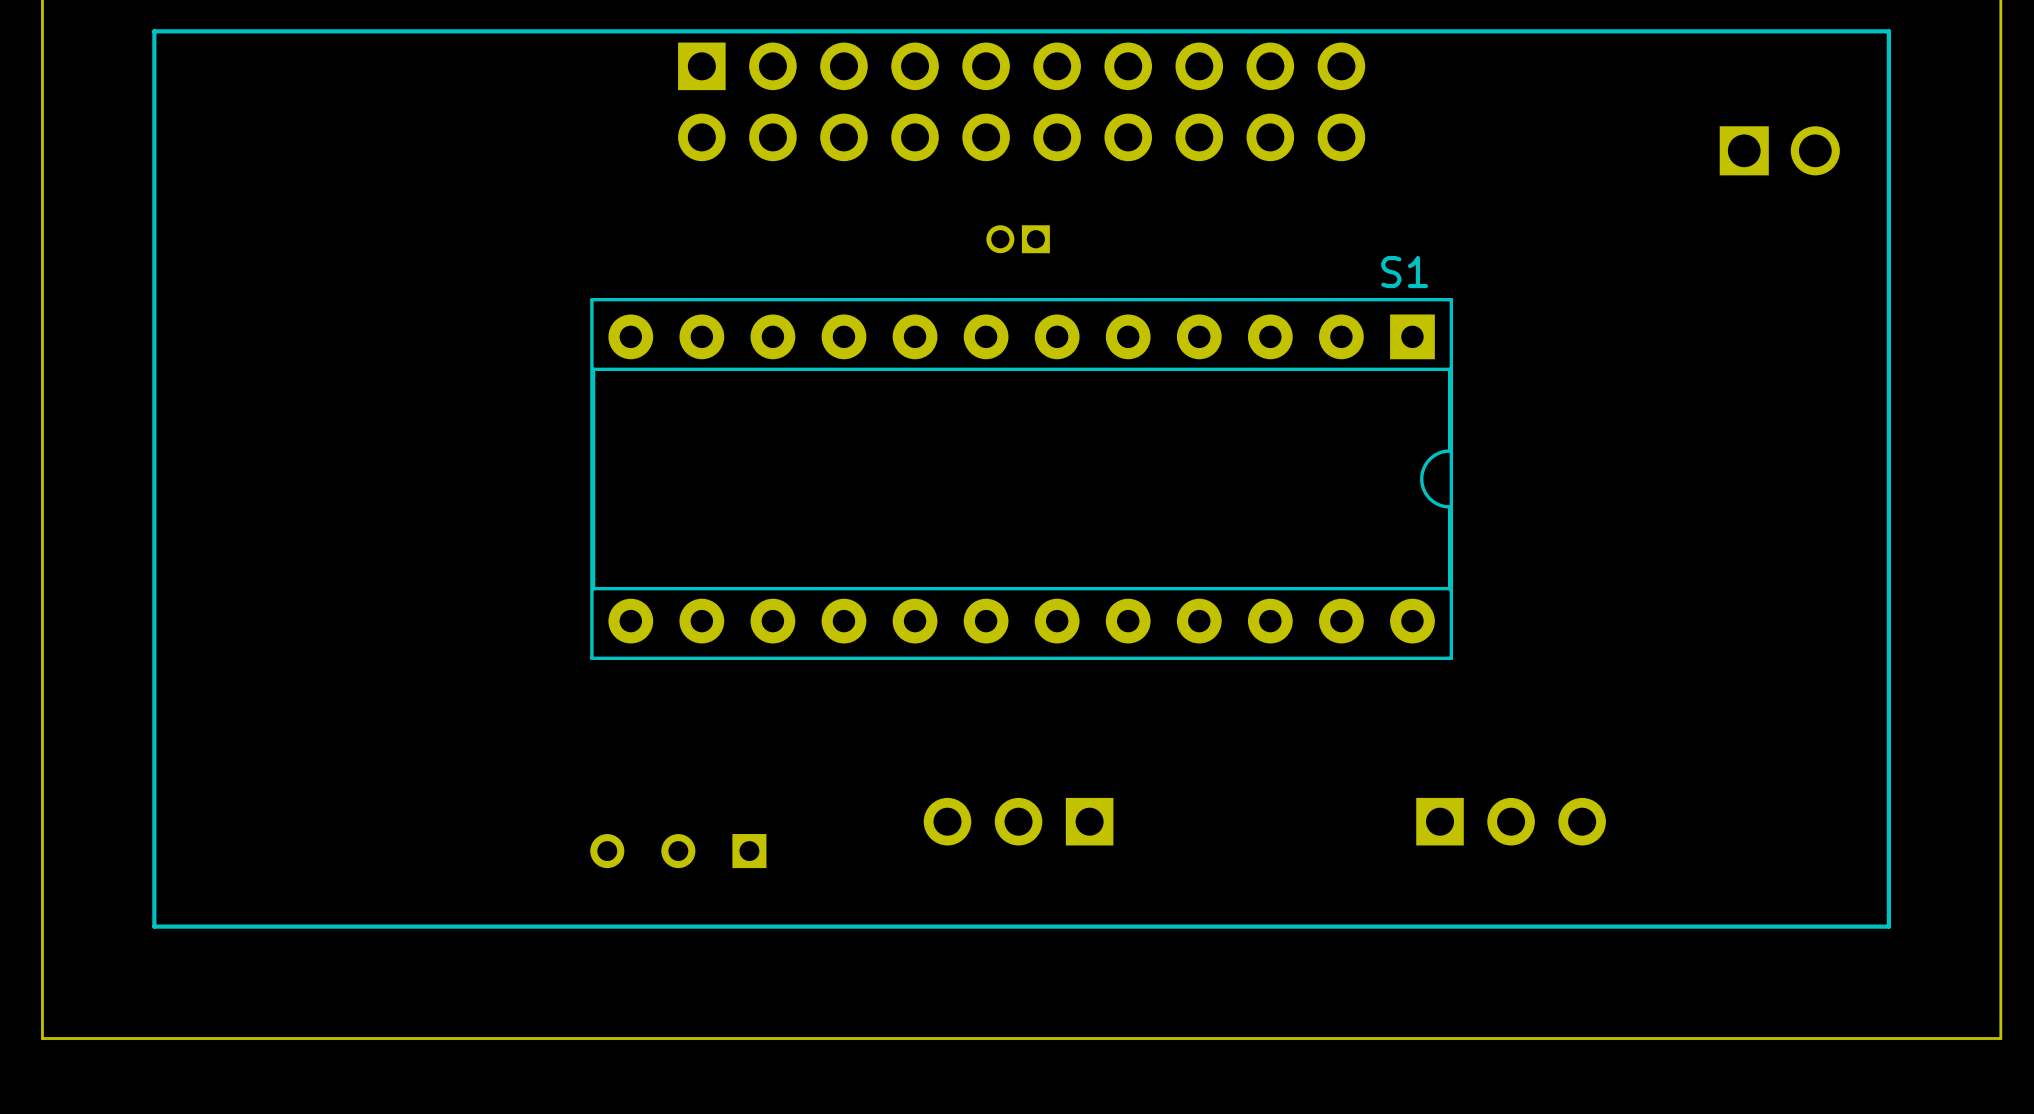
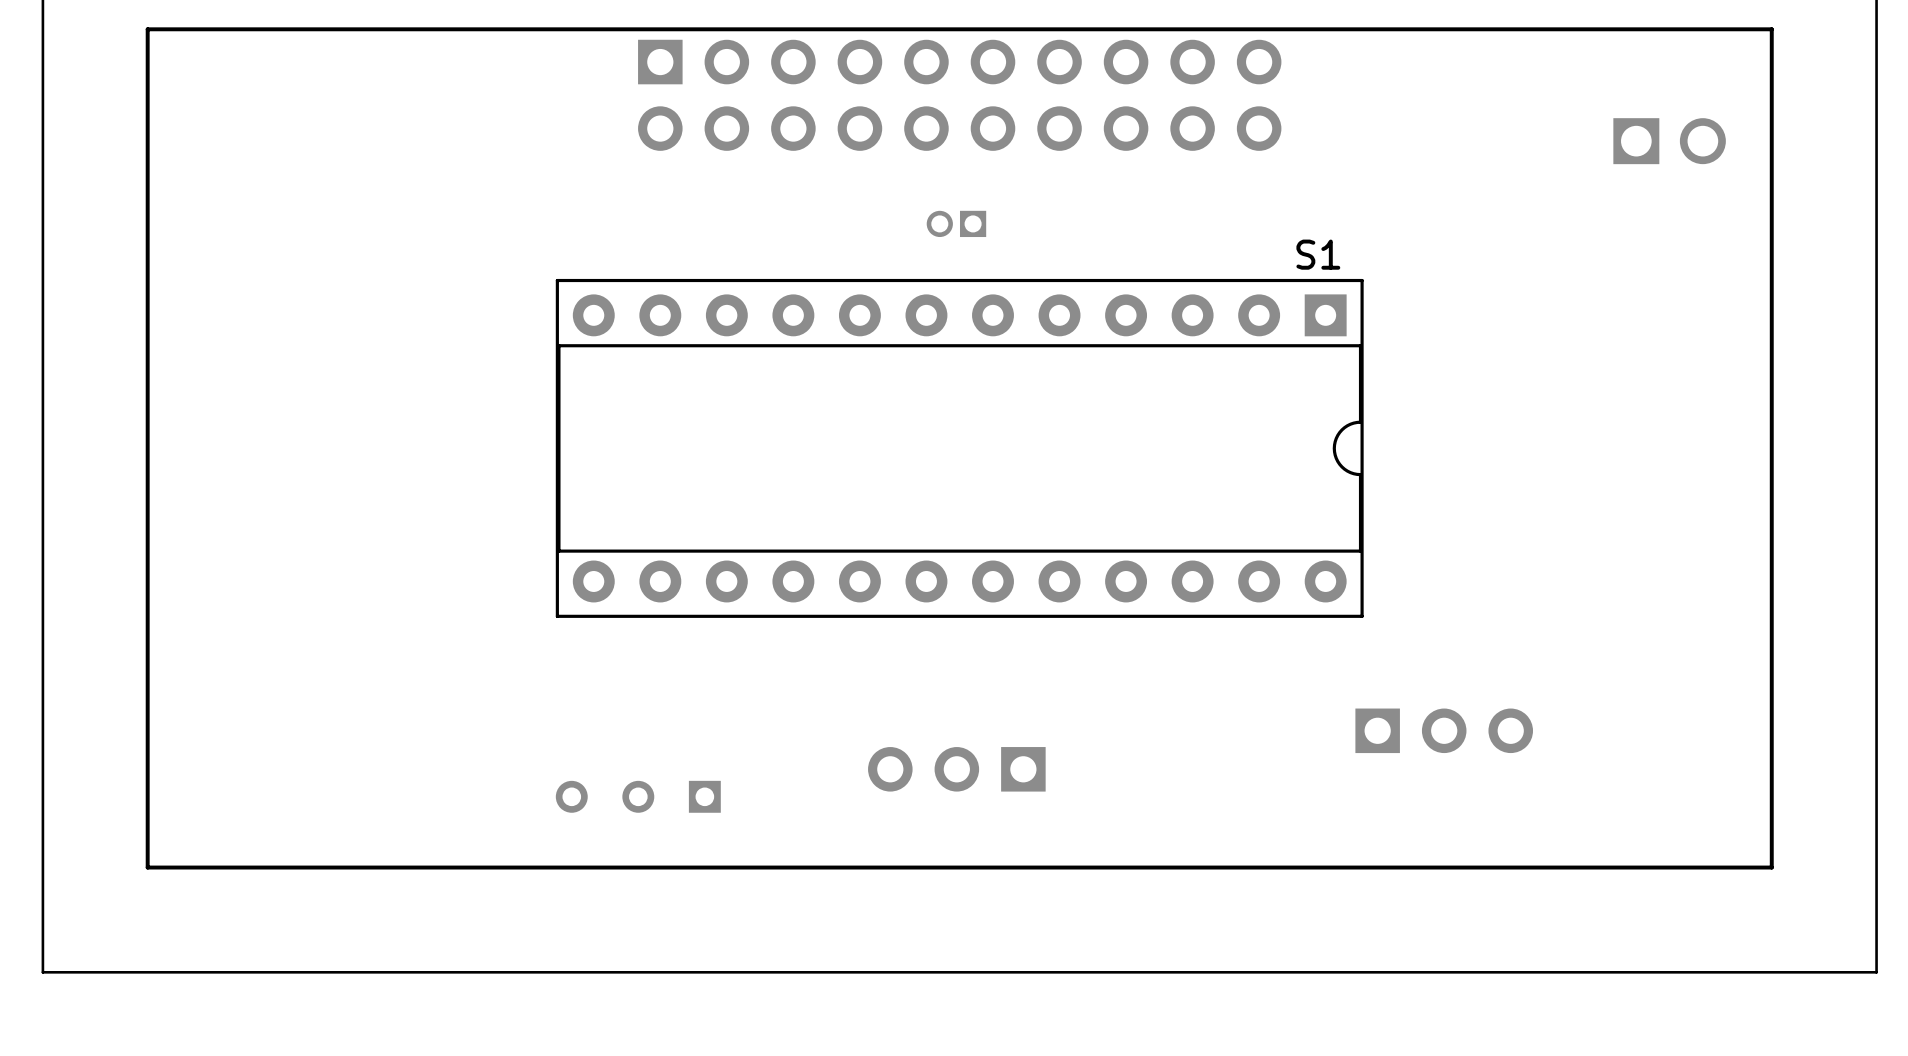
part position: (1511, 821) -> (1444, 730)

